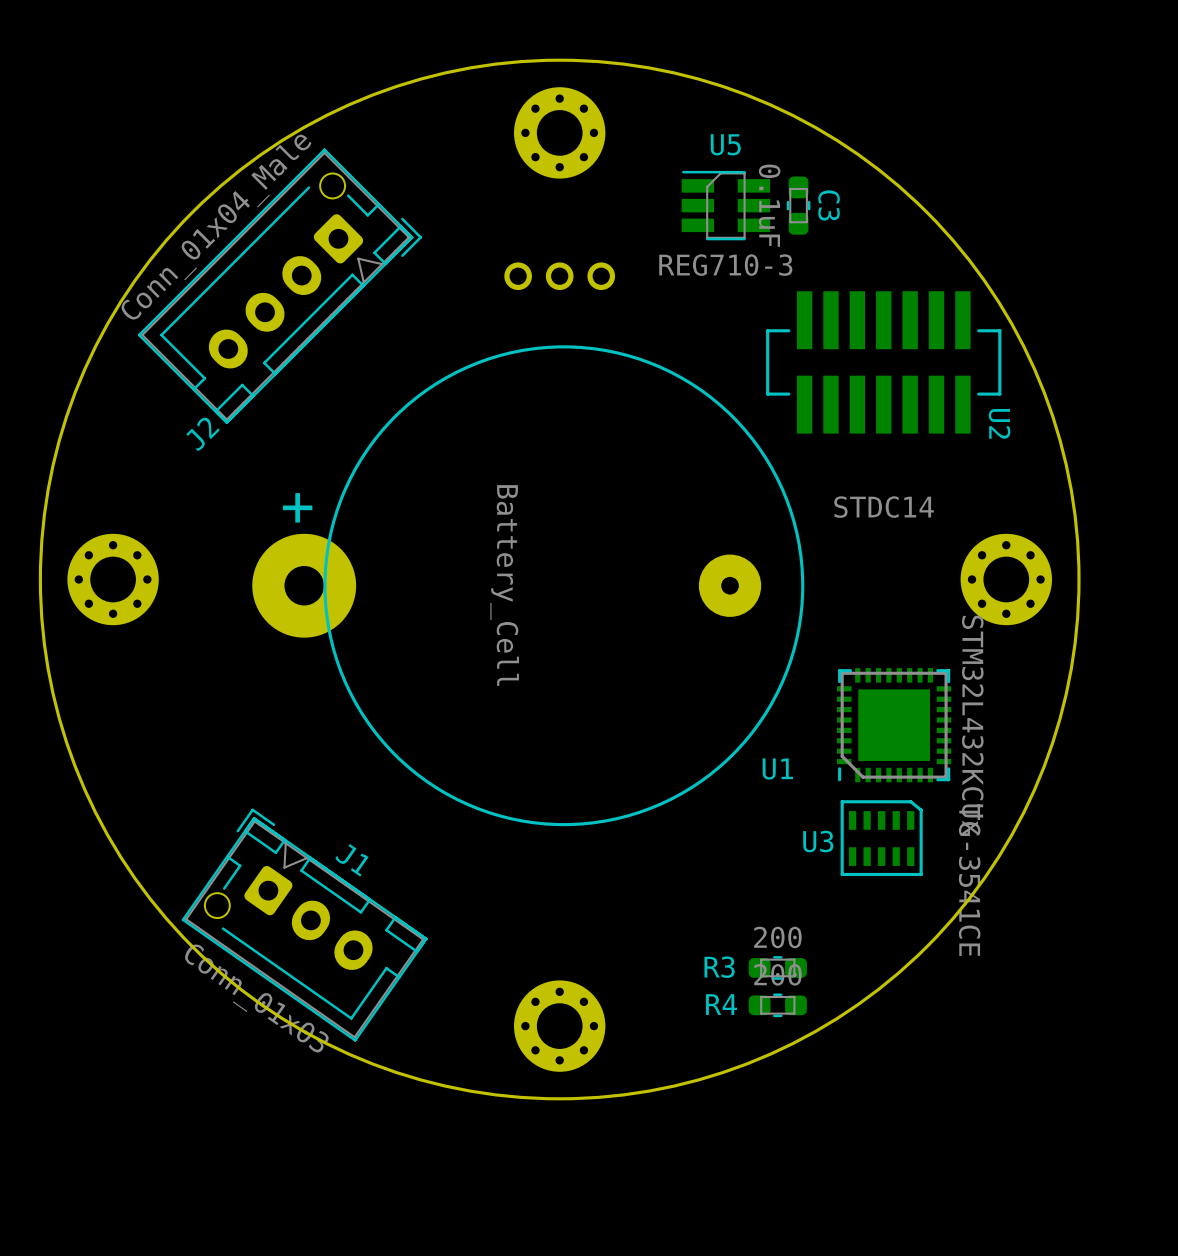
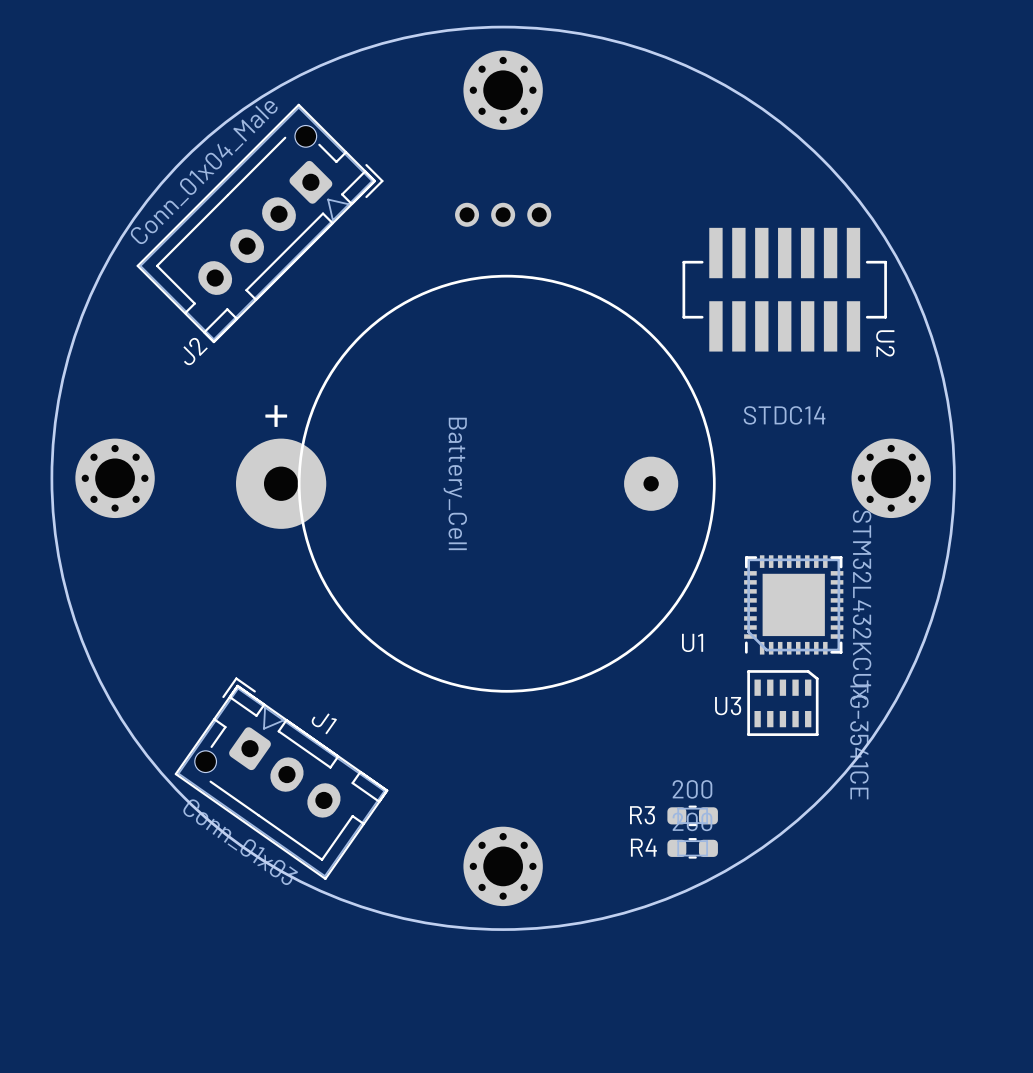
U5: REG710-3 (725, 205) -> none
C3: 0.1uF (798, 205) -> none

